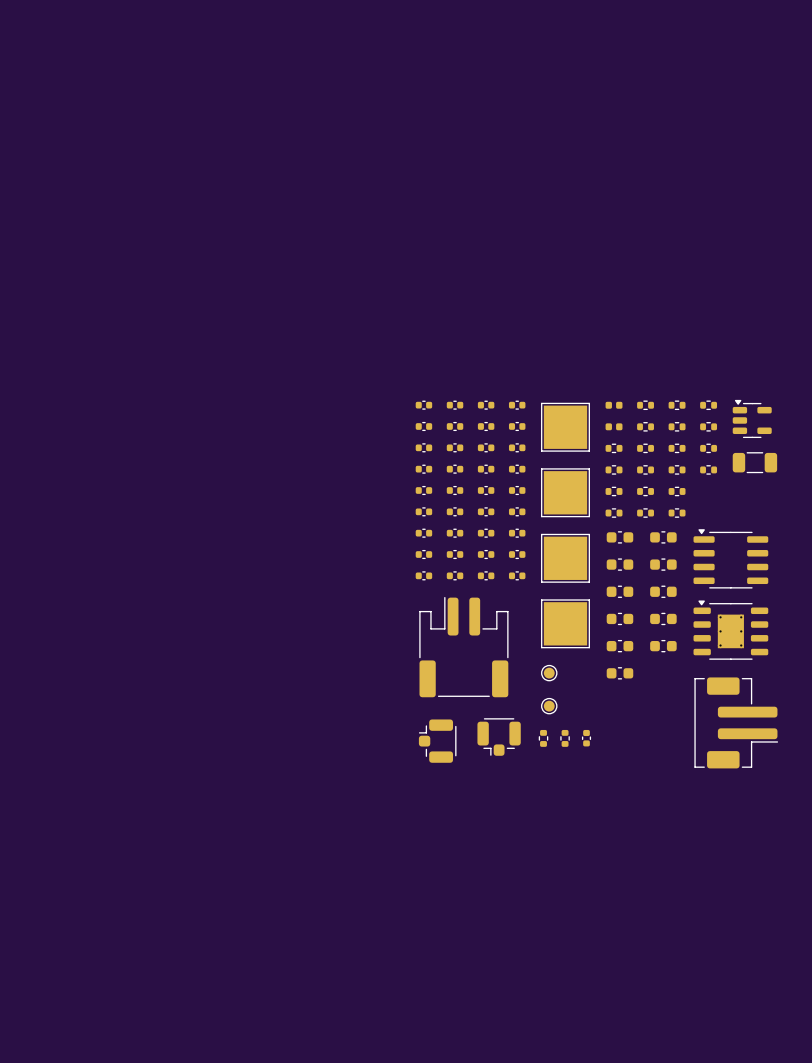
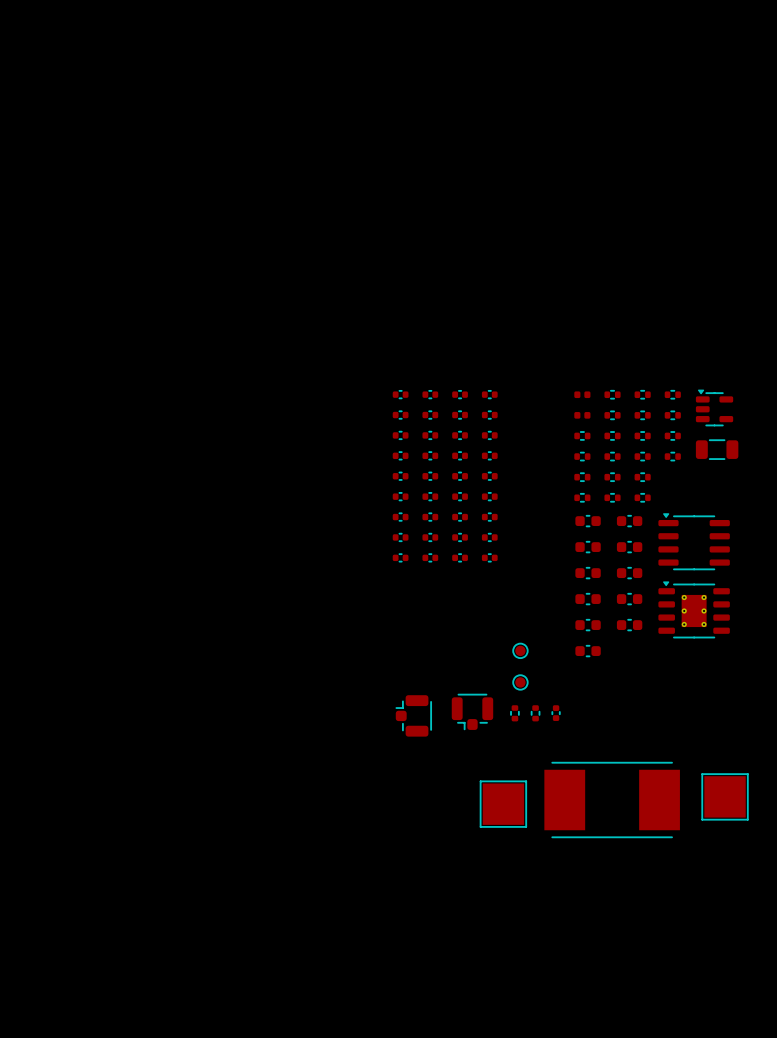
part: (565, 427) -> none
part: (565, 492) -> none
part: (565, 558) -> none
part: (565, 623) -> none
part: (463, 647) -> none
part: (736, 722) -> none
part: none -> (725, 796)
part: none -> (612, 800)
part: none -> (503, 804)

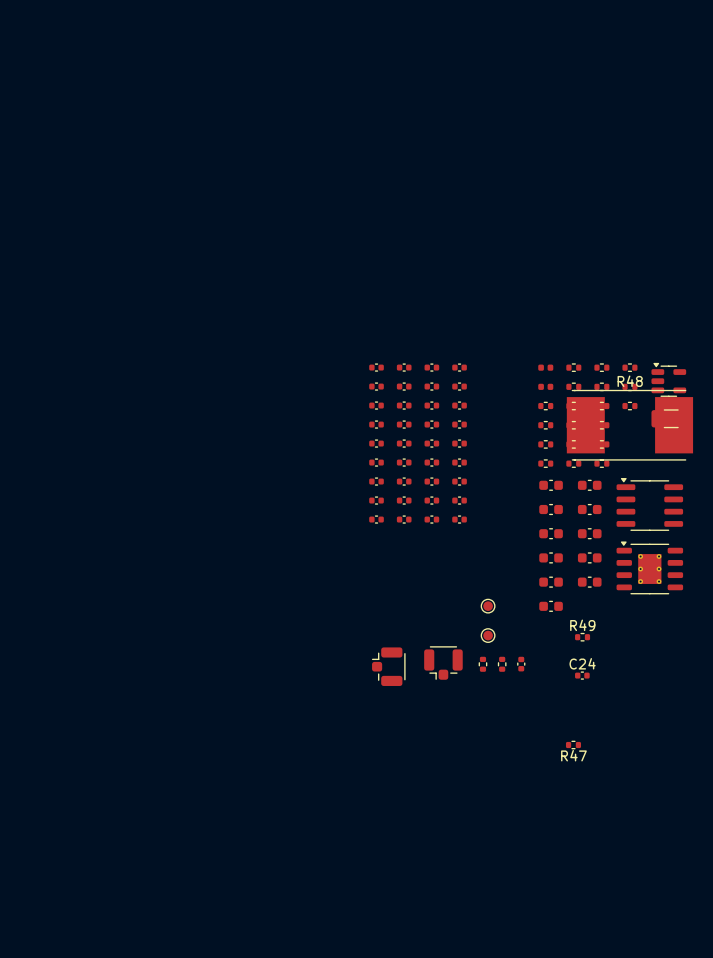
part: (672, 456) -> none
R48: none -> (629, 425)
R49: none -> (582, 637)
C24: none -> (582, 675)
part: (725, 796) -> none
part: (612, 800) -> none
R47: none -> (573, 745)
part: (503, 804) -> none

